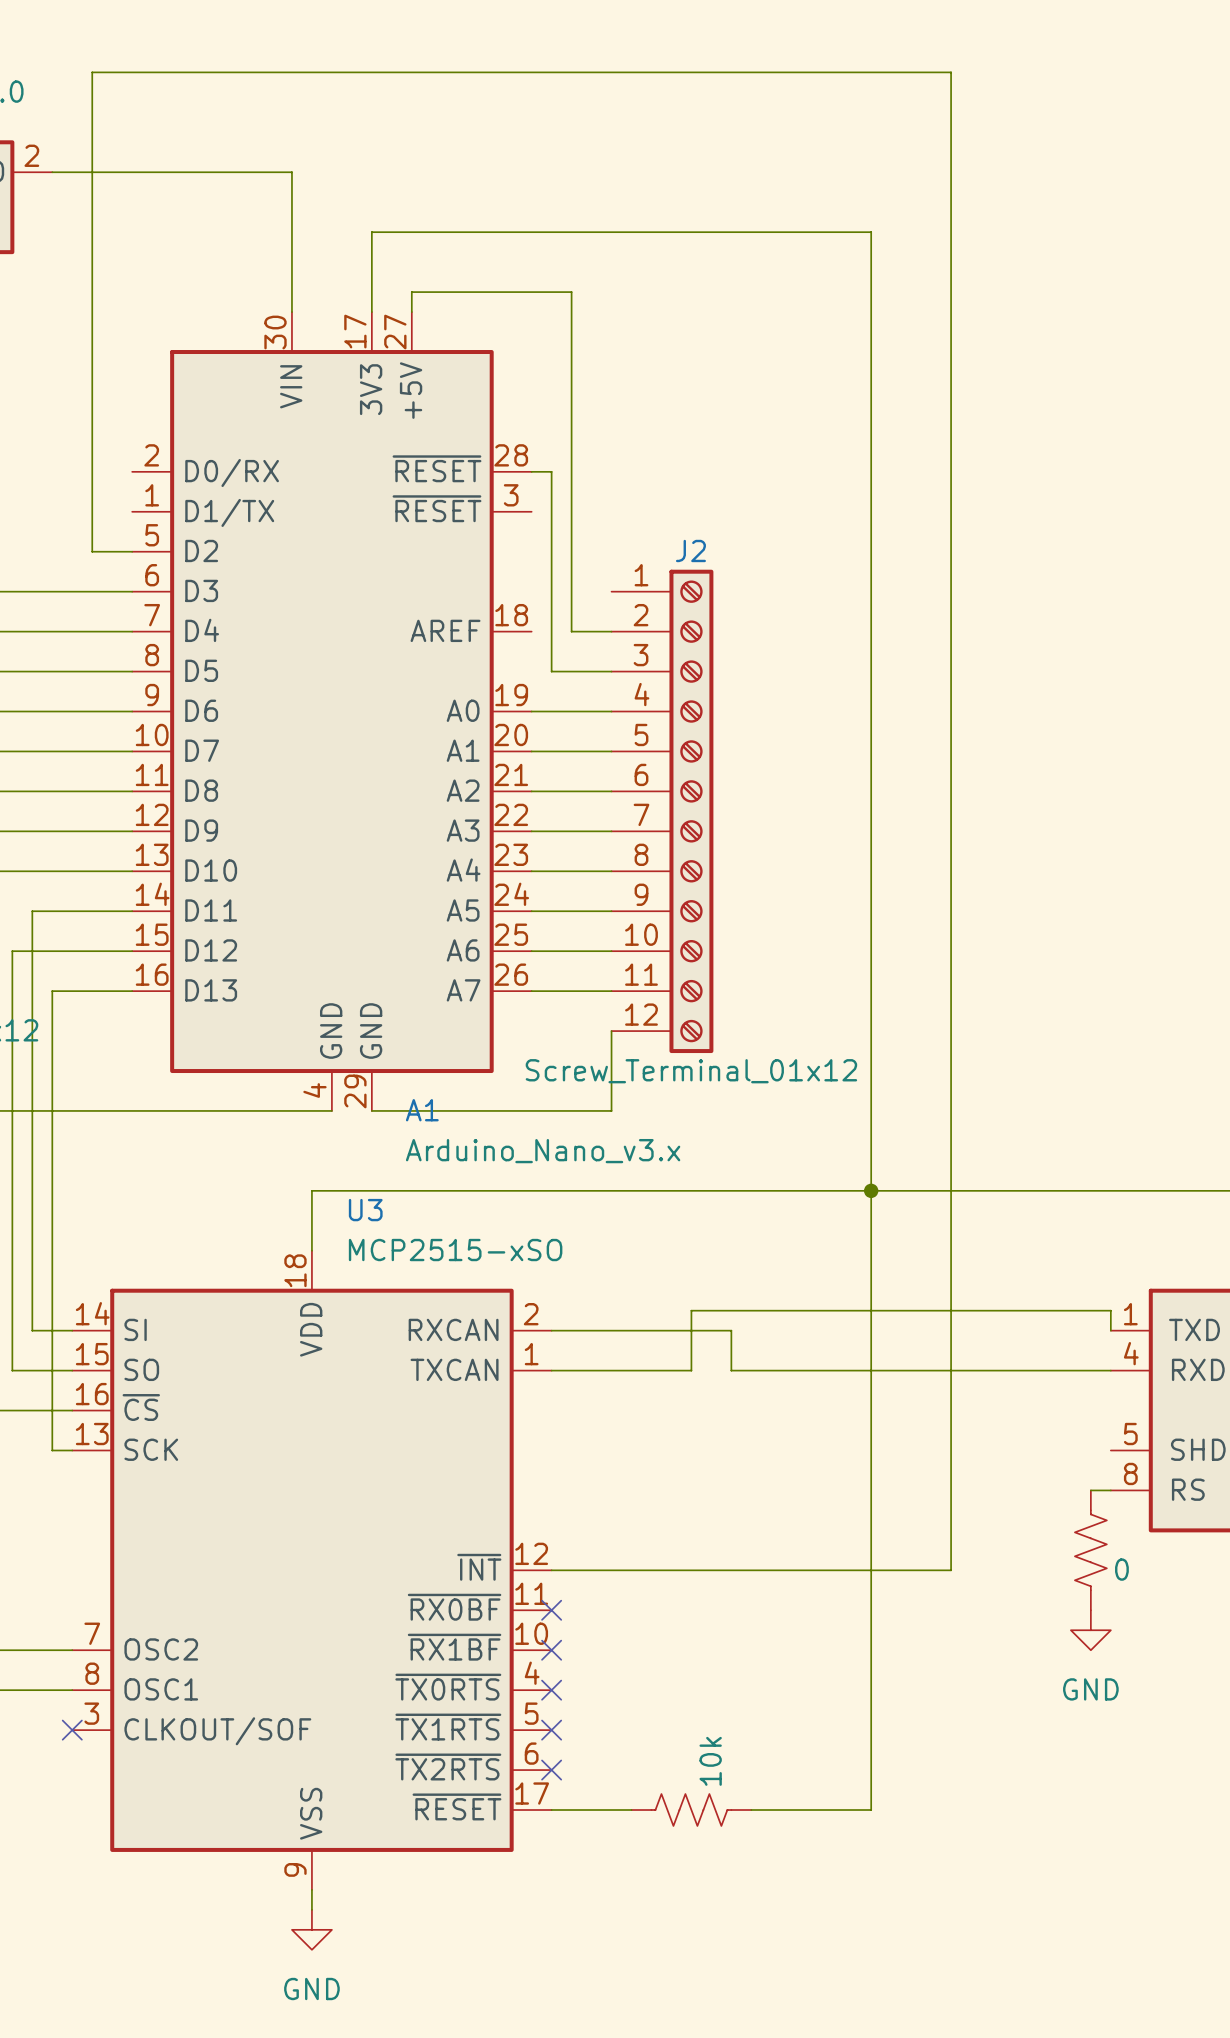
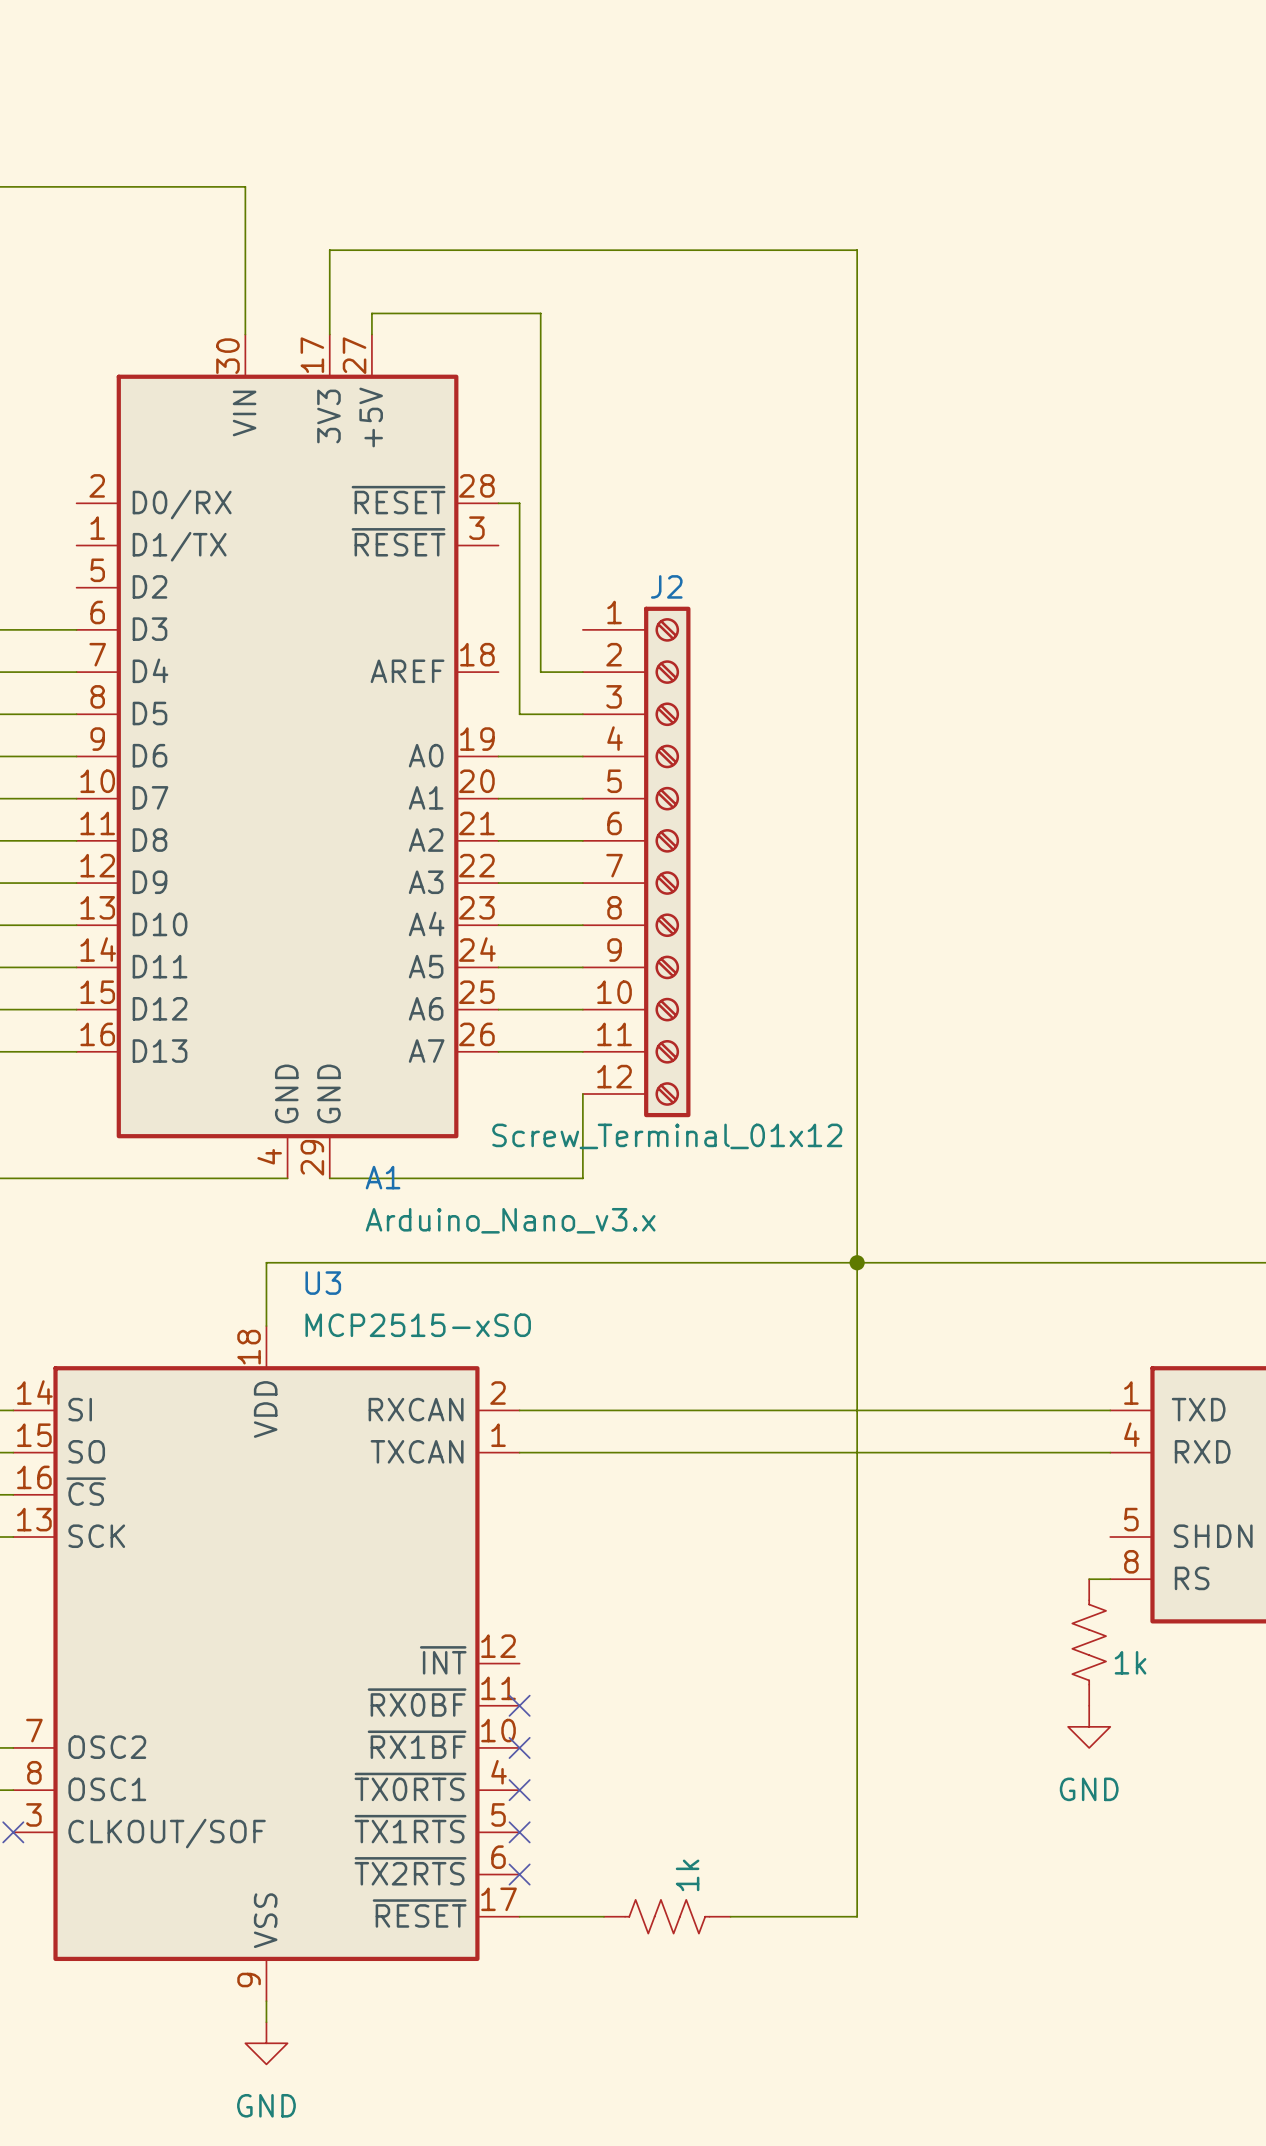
wire: (132, 551) (92, 551) (92, 72) (951, 72) (951, 1570) (551, 1570) -> none
wire: (731, 1330) (731, 1370) -> (667, 1452) (709, 1452)
wire: (1110, 1330) (1110, 1310) (691, 1310) (691, 1370) -> (1110, 1410) (709, 1410)
part value: 0 (1121, 1569) -> 1k (1130, 1662)
part value: 10k (710, 1761) -> 1k (687, 1875)

